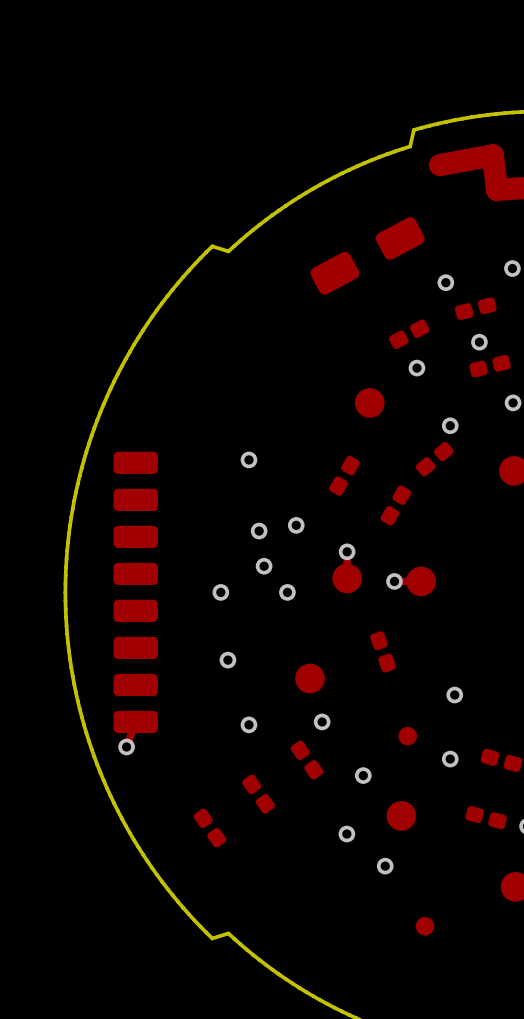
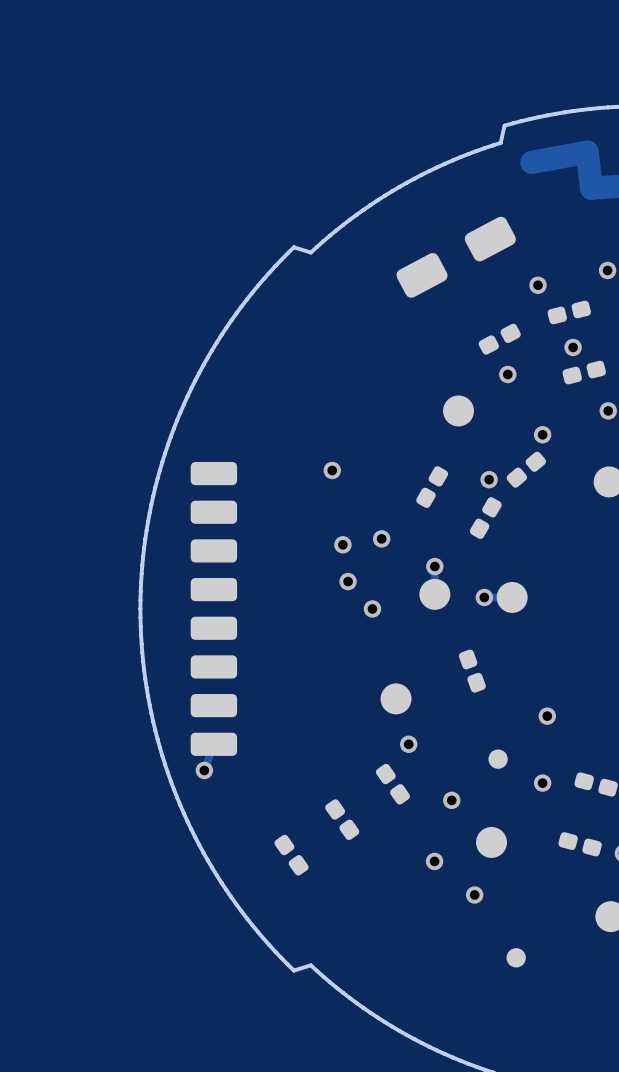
via: none -> (489, 479)
via: (220, 592) -> none
via: (227, 660) -> none
via: (248, 724) -> none

